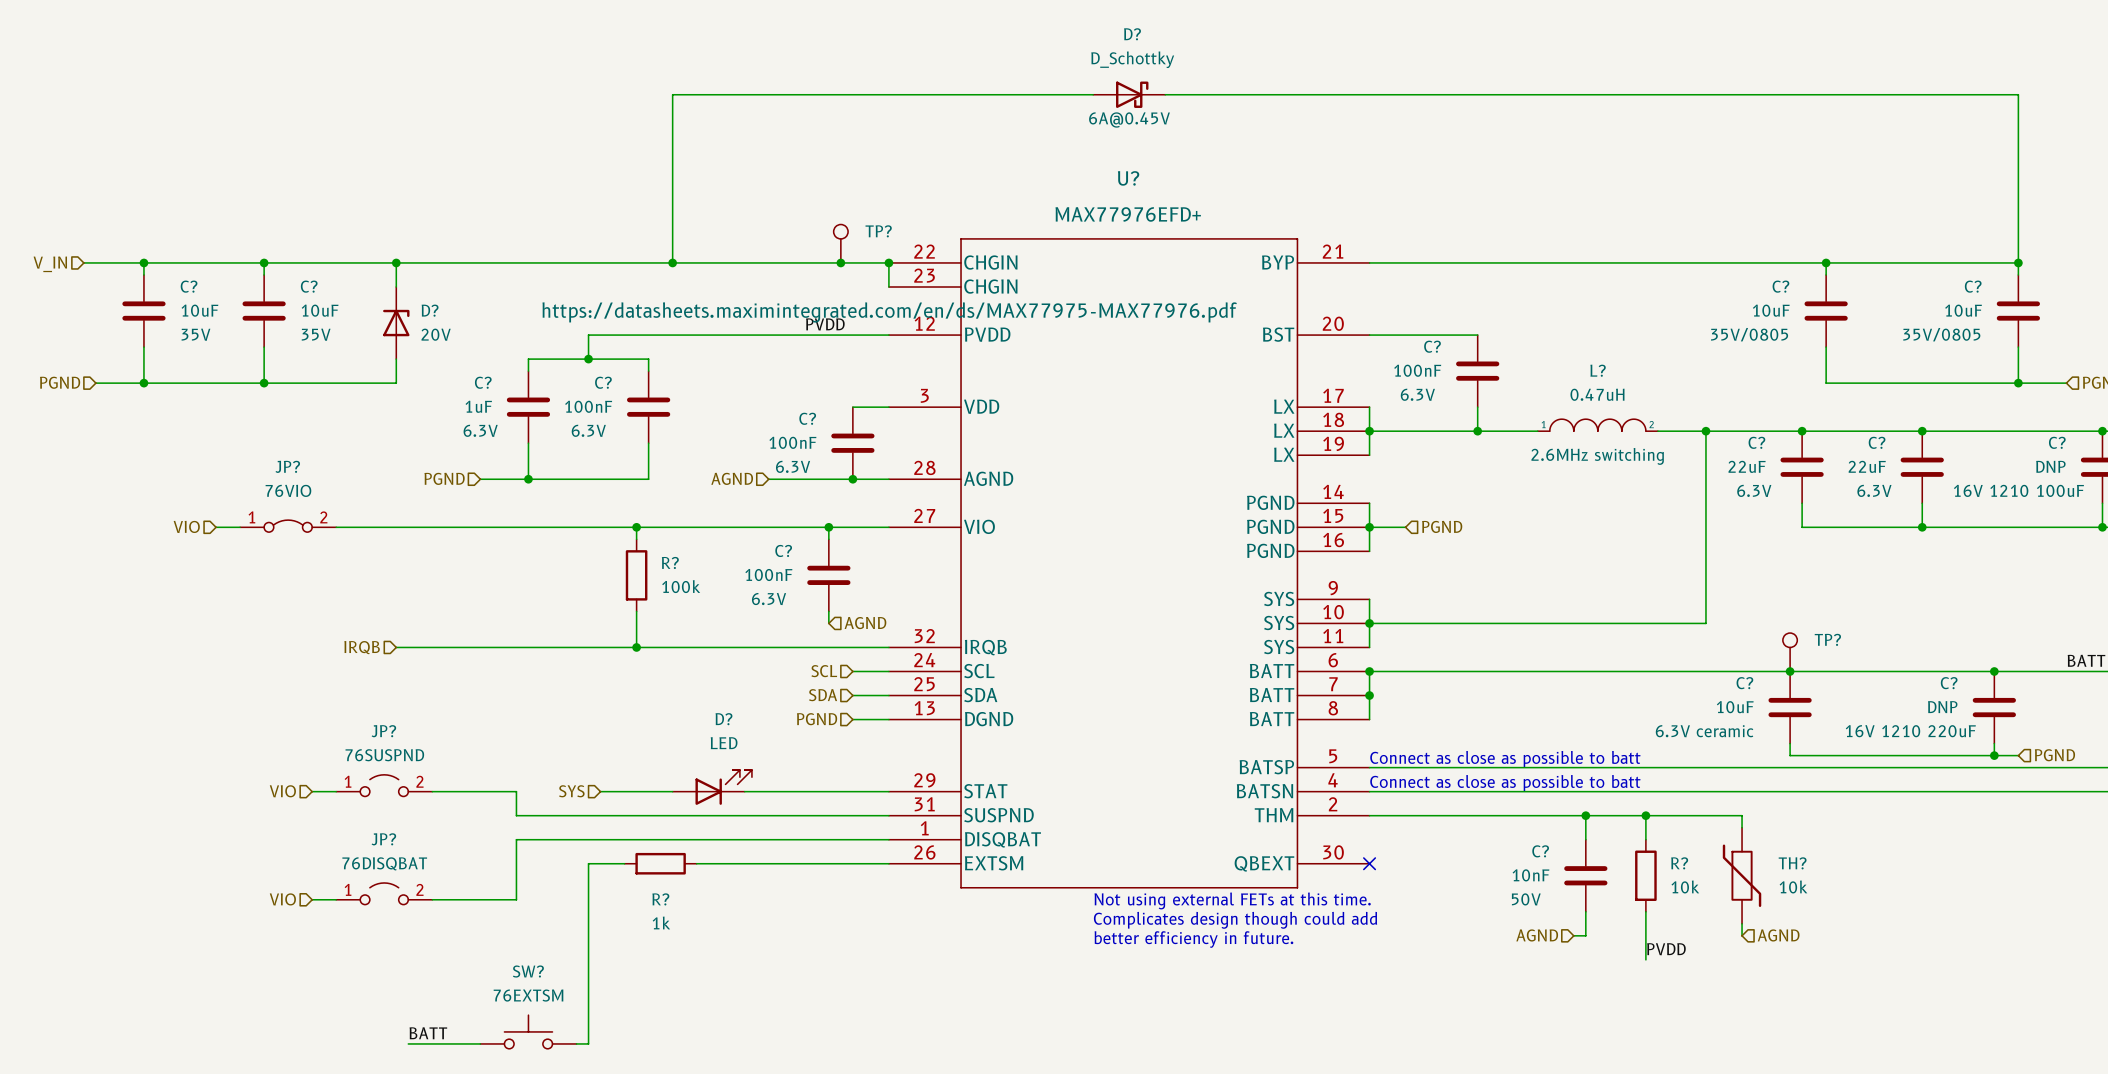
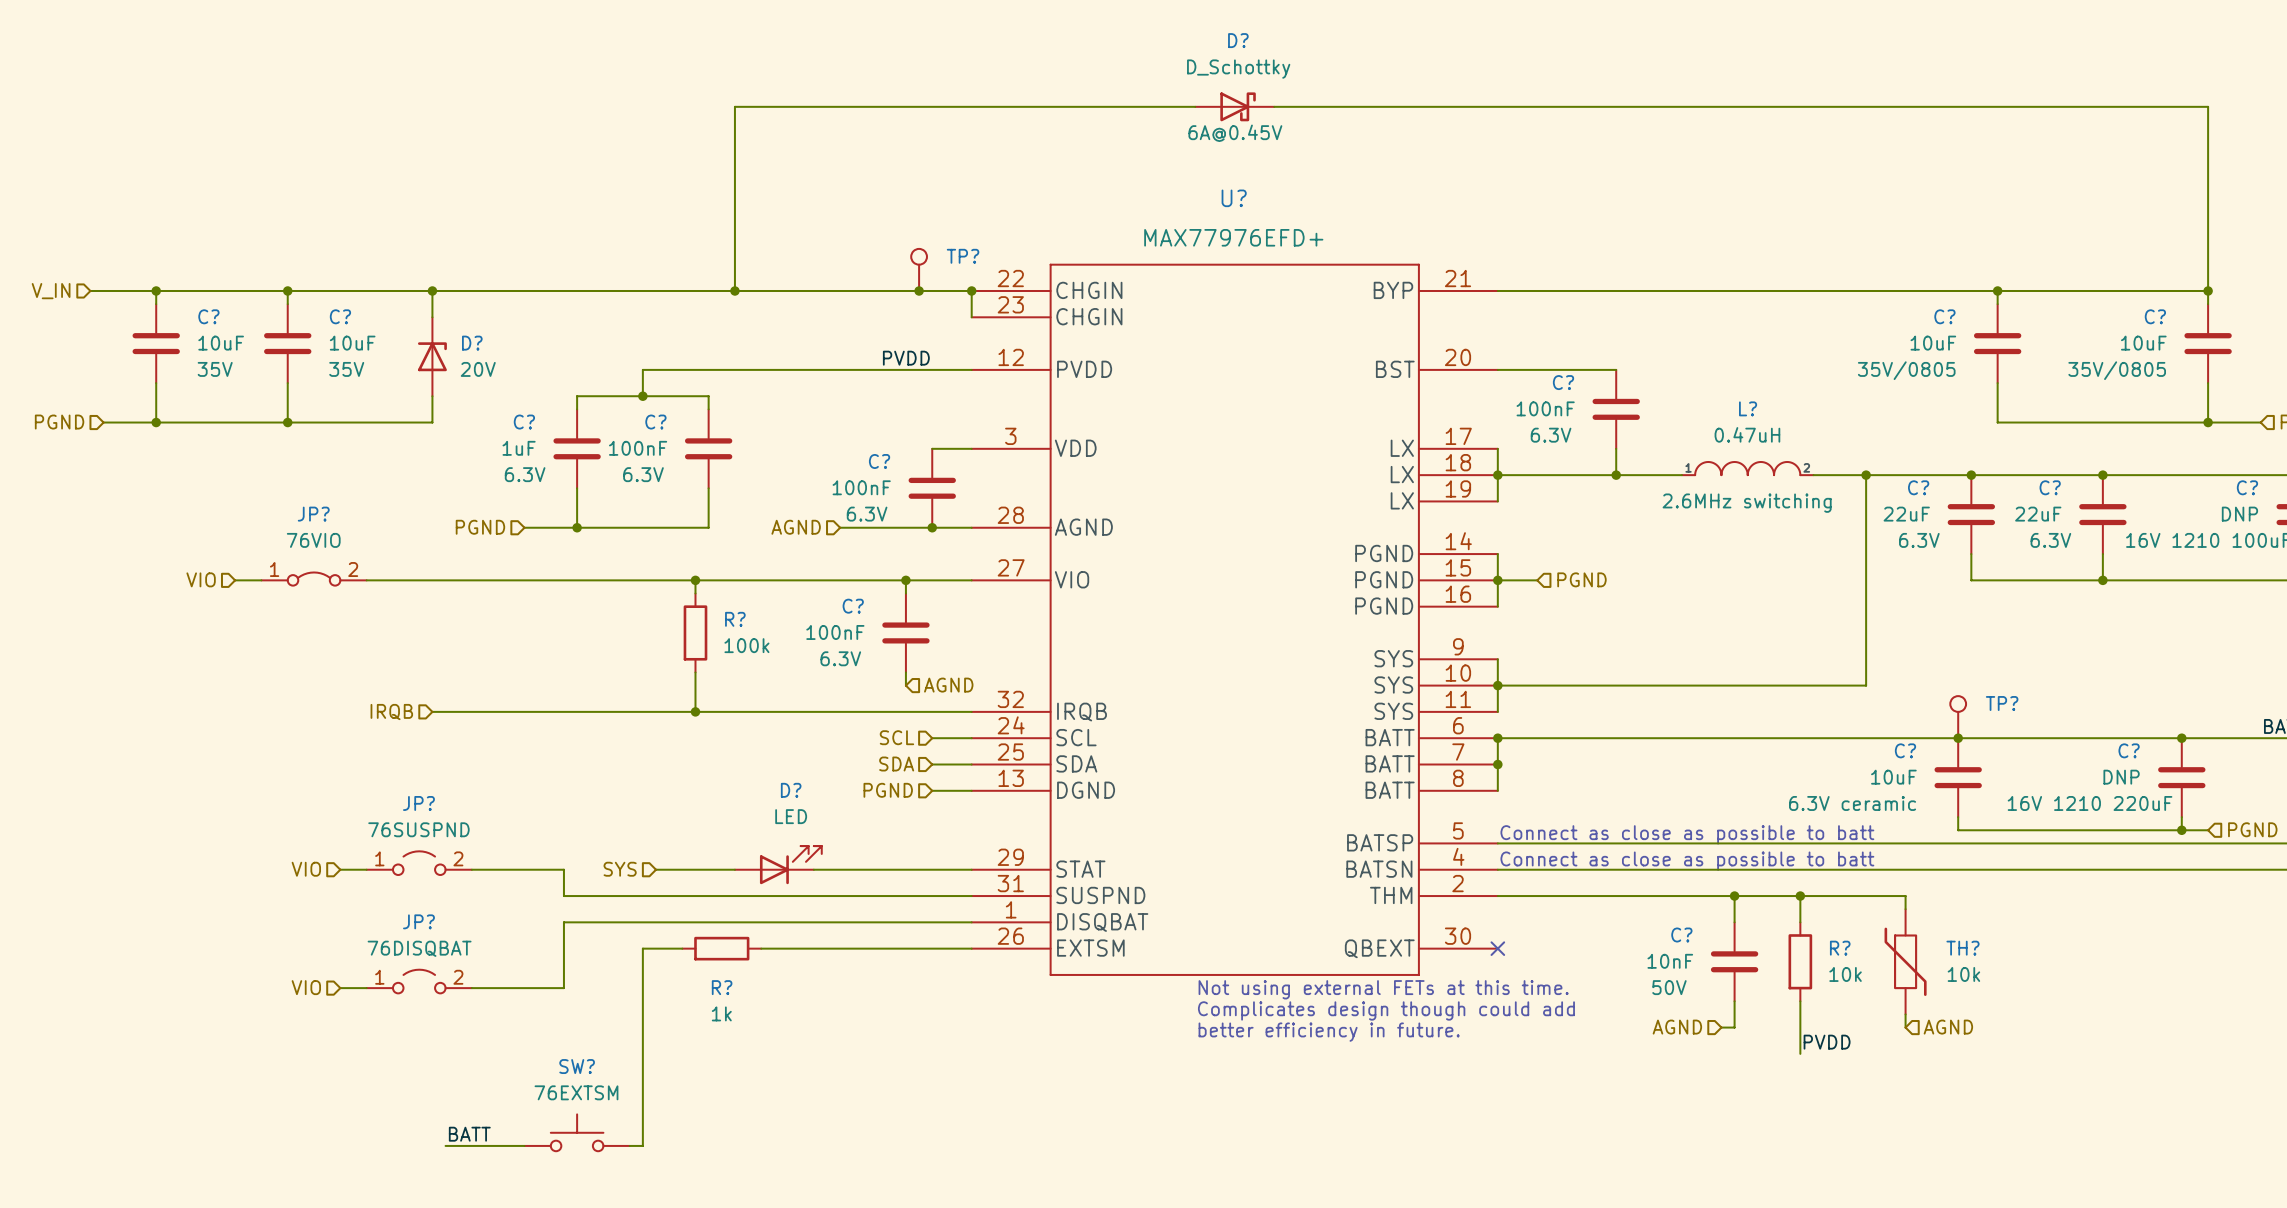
U? text: https://datasheets.maximintegrated.com/en/ds/MAX77975-MAX77976.pdf (889, 312) -> none

